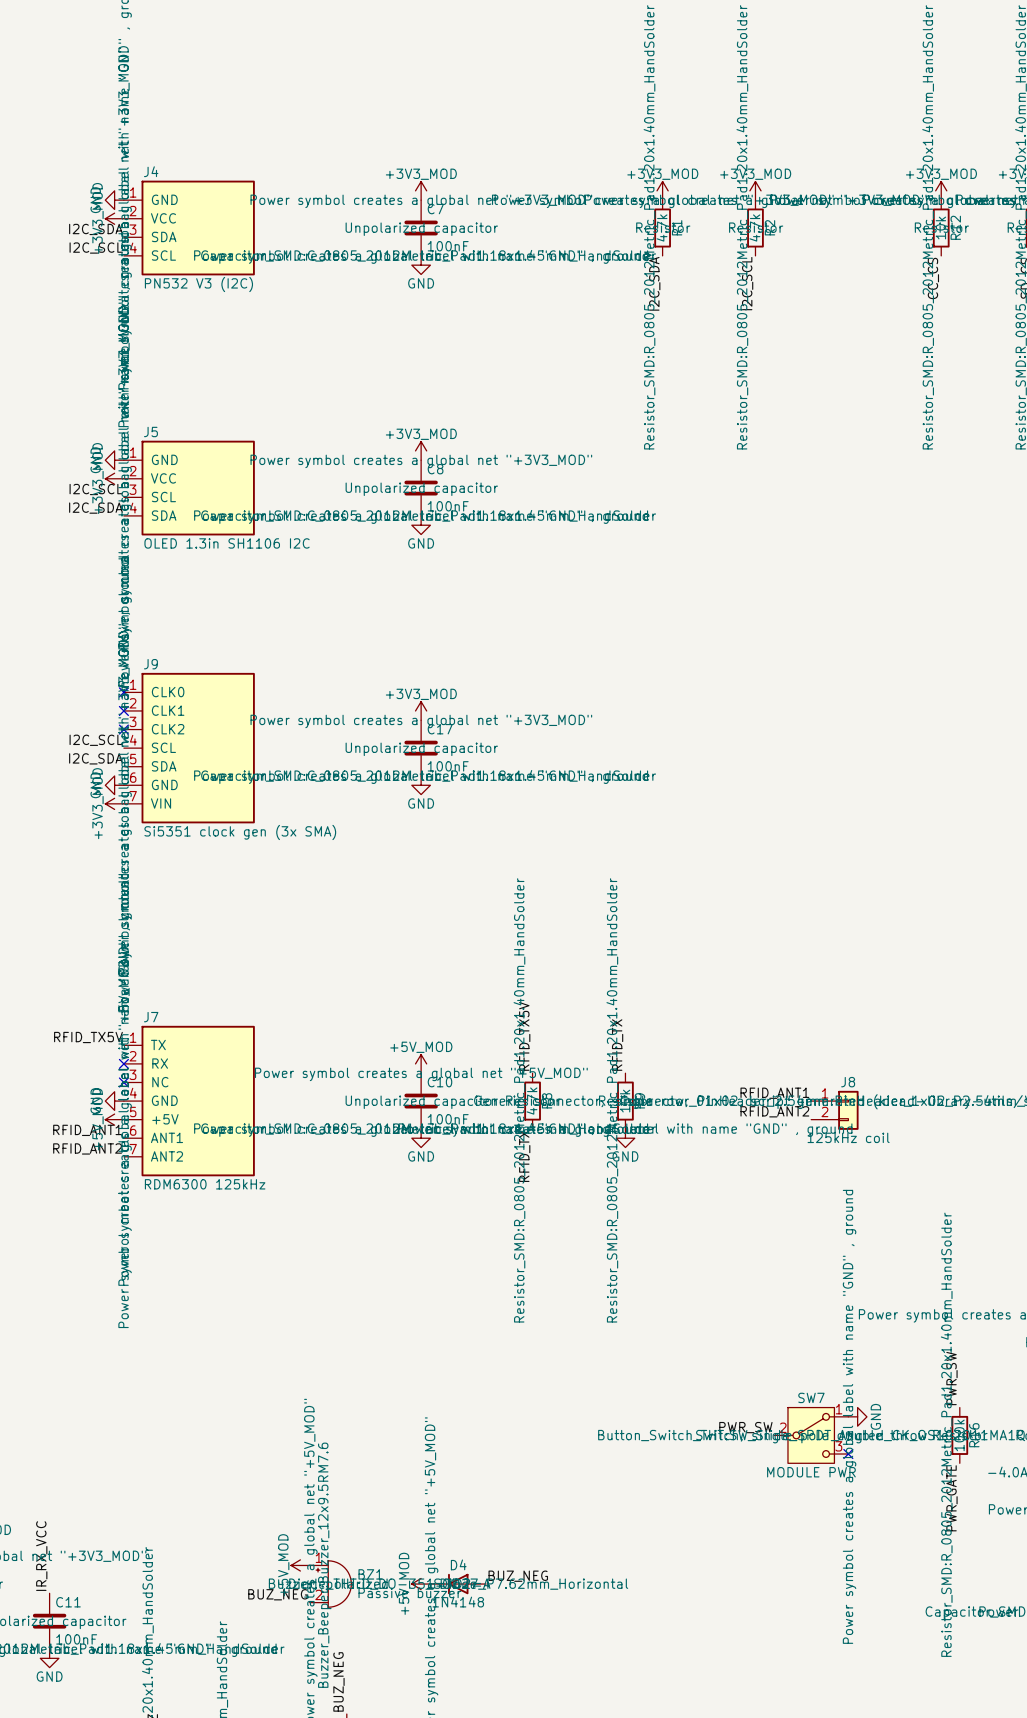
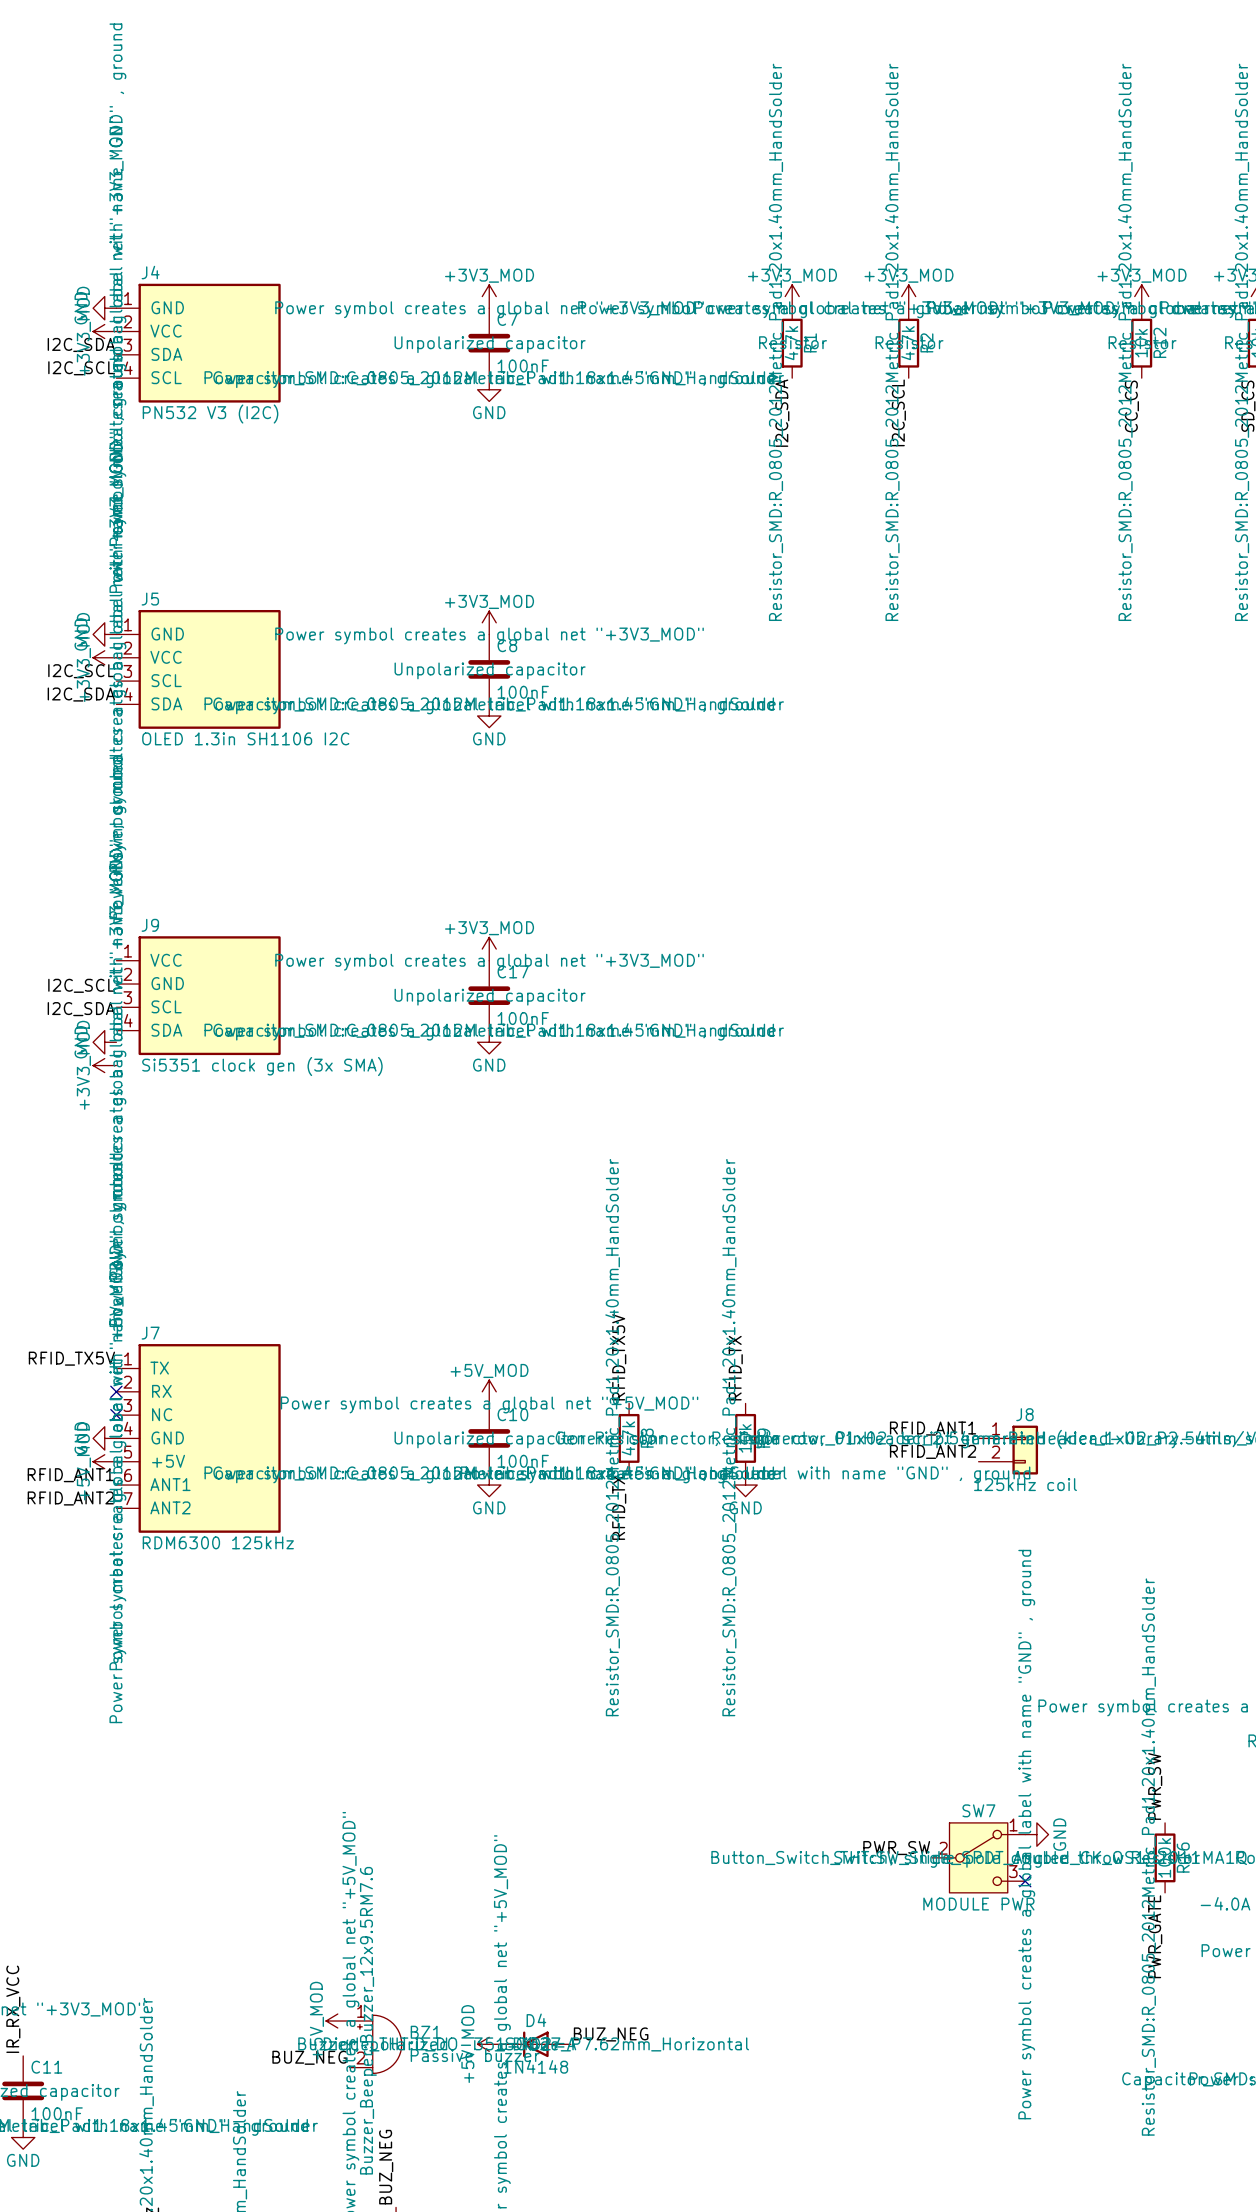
J9 name position: J9 (150, 664) -> J9 (150, 925)
J9 symbol: [123, 672, 255, 824] -> [116, 936, 281, 1056]
no-connect mark: (123, 692) -> none
no-connect mark: (123, 710) -> none
no-connect mark: (123, 729) -> none
J9 value position: Si5351 clock gen (3x SMA) (240, 832) -> Si5351 clock gen (3x SMA) (262, 1066)

